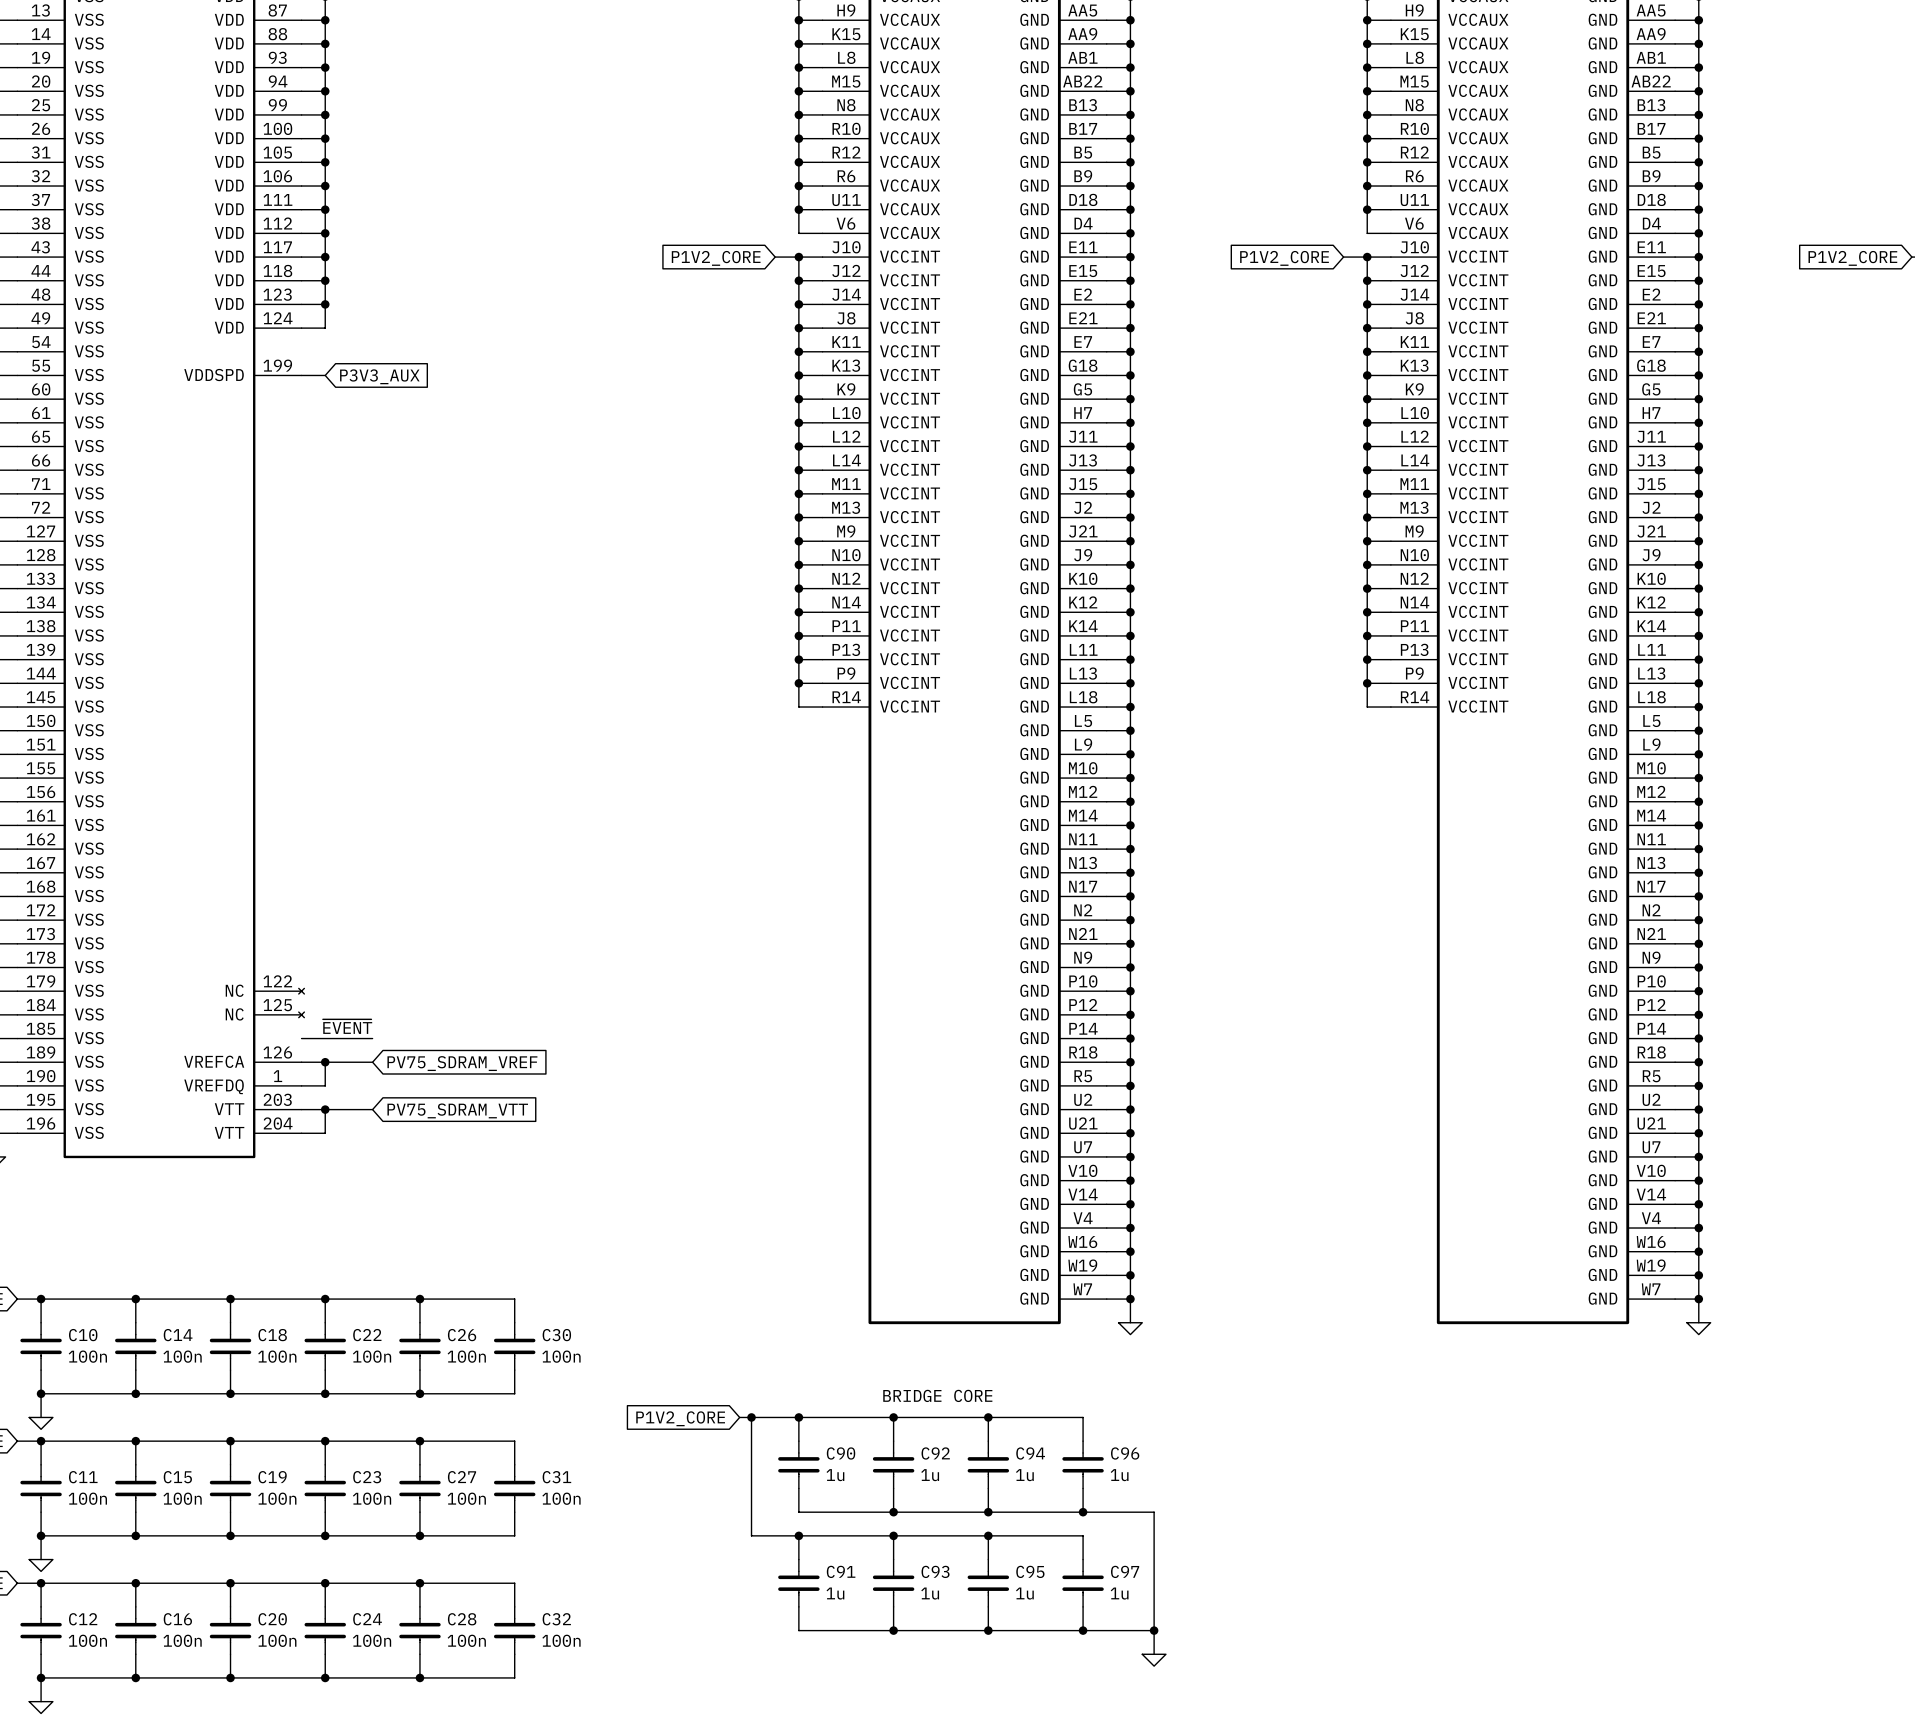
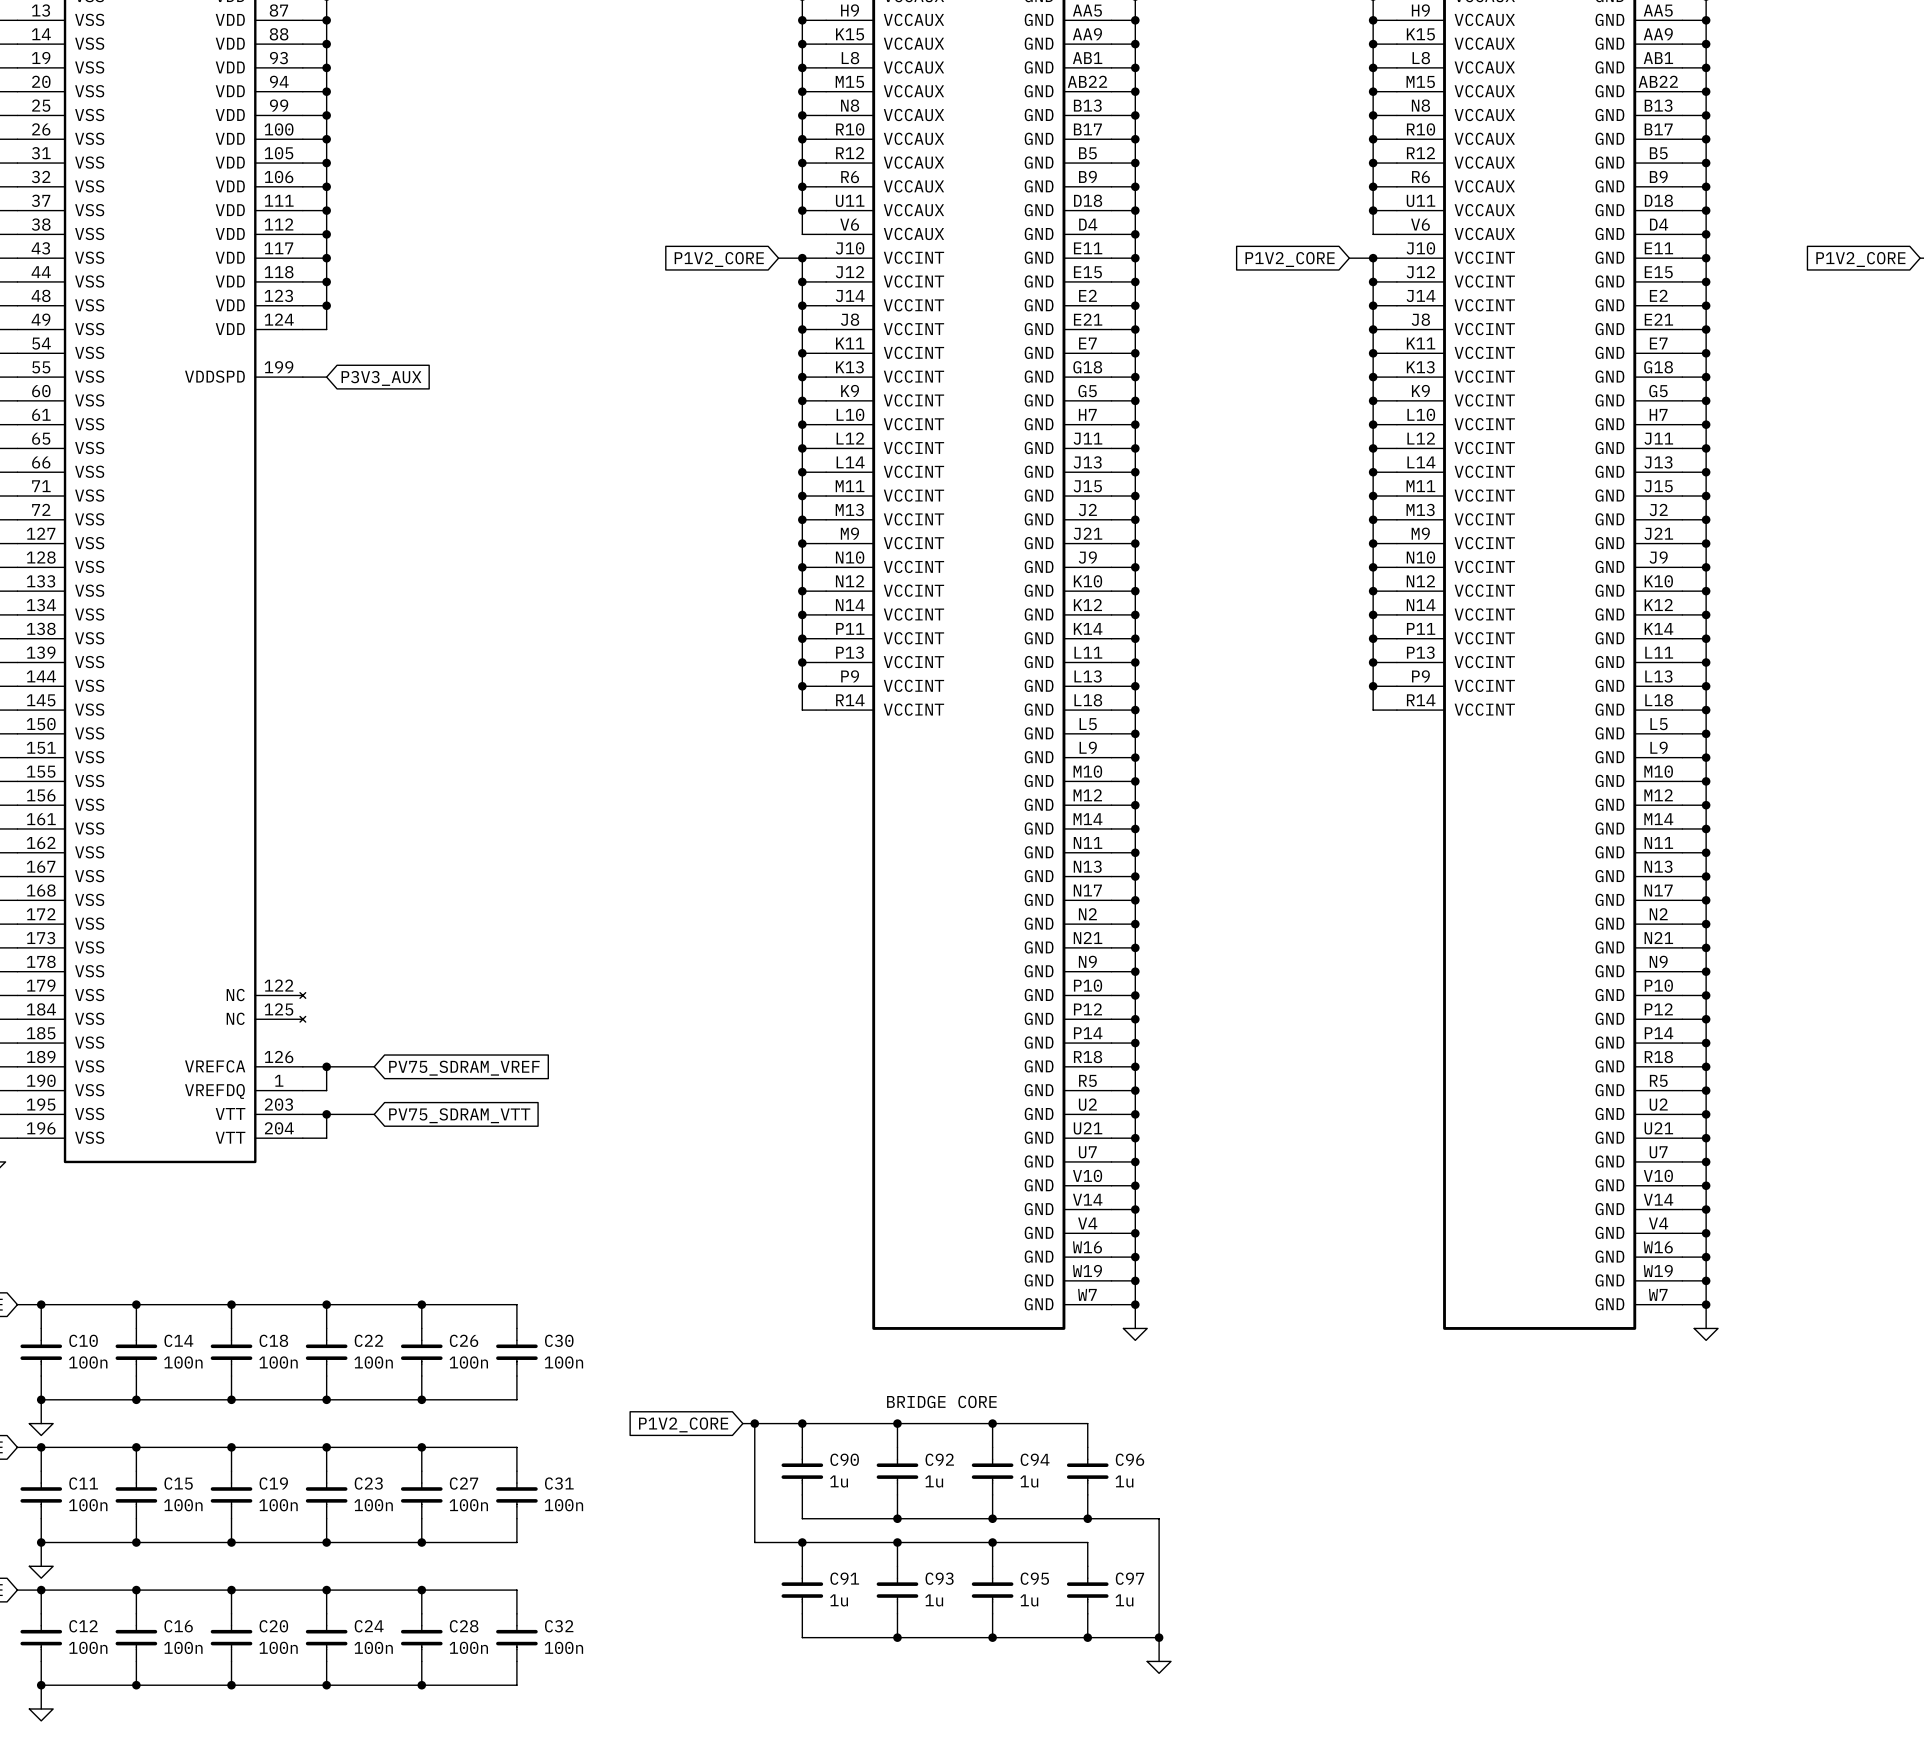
label: ~{EVENT} (347, 1026) -> none
wire: (301, 1038) (372, 1038) -> none

